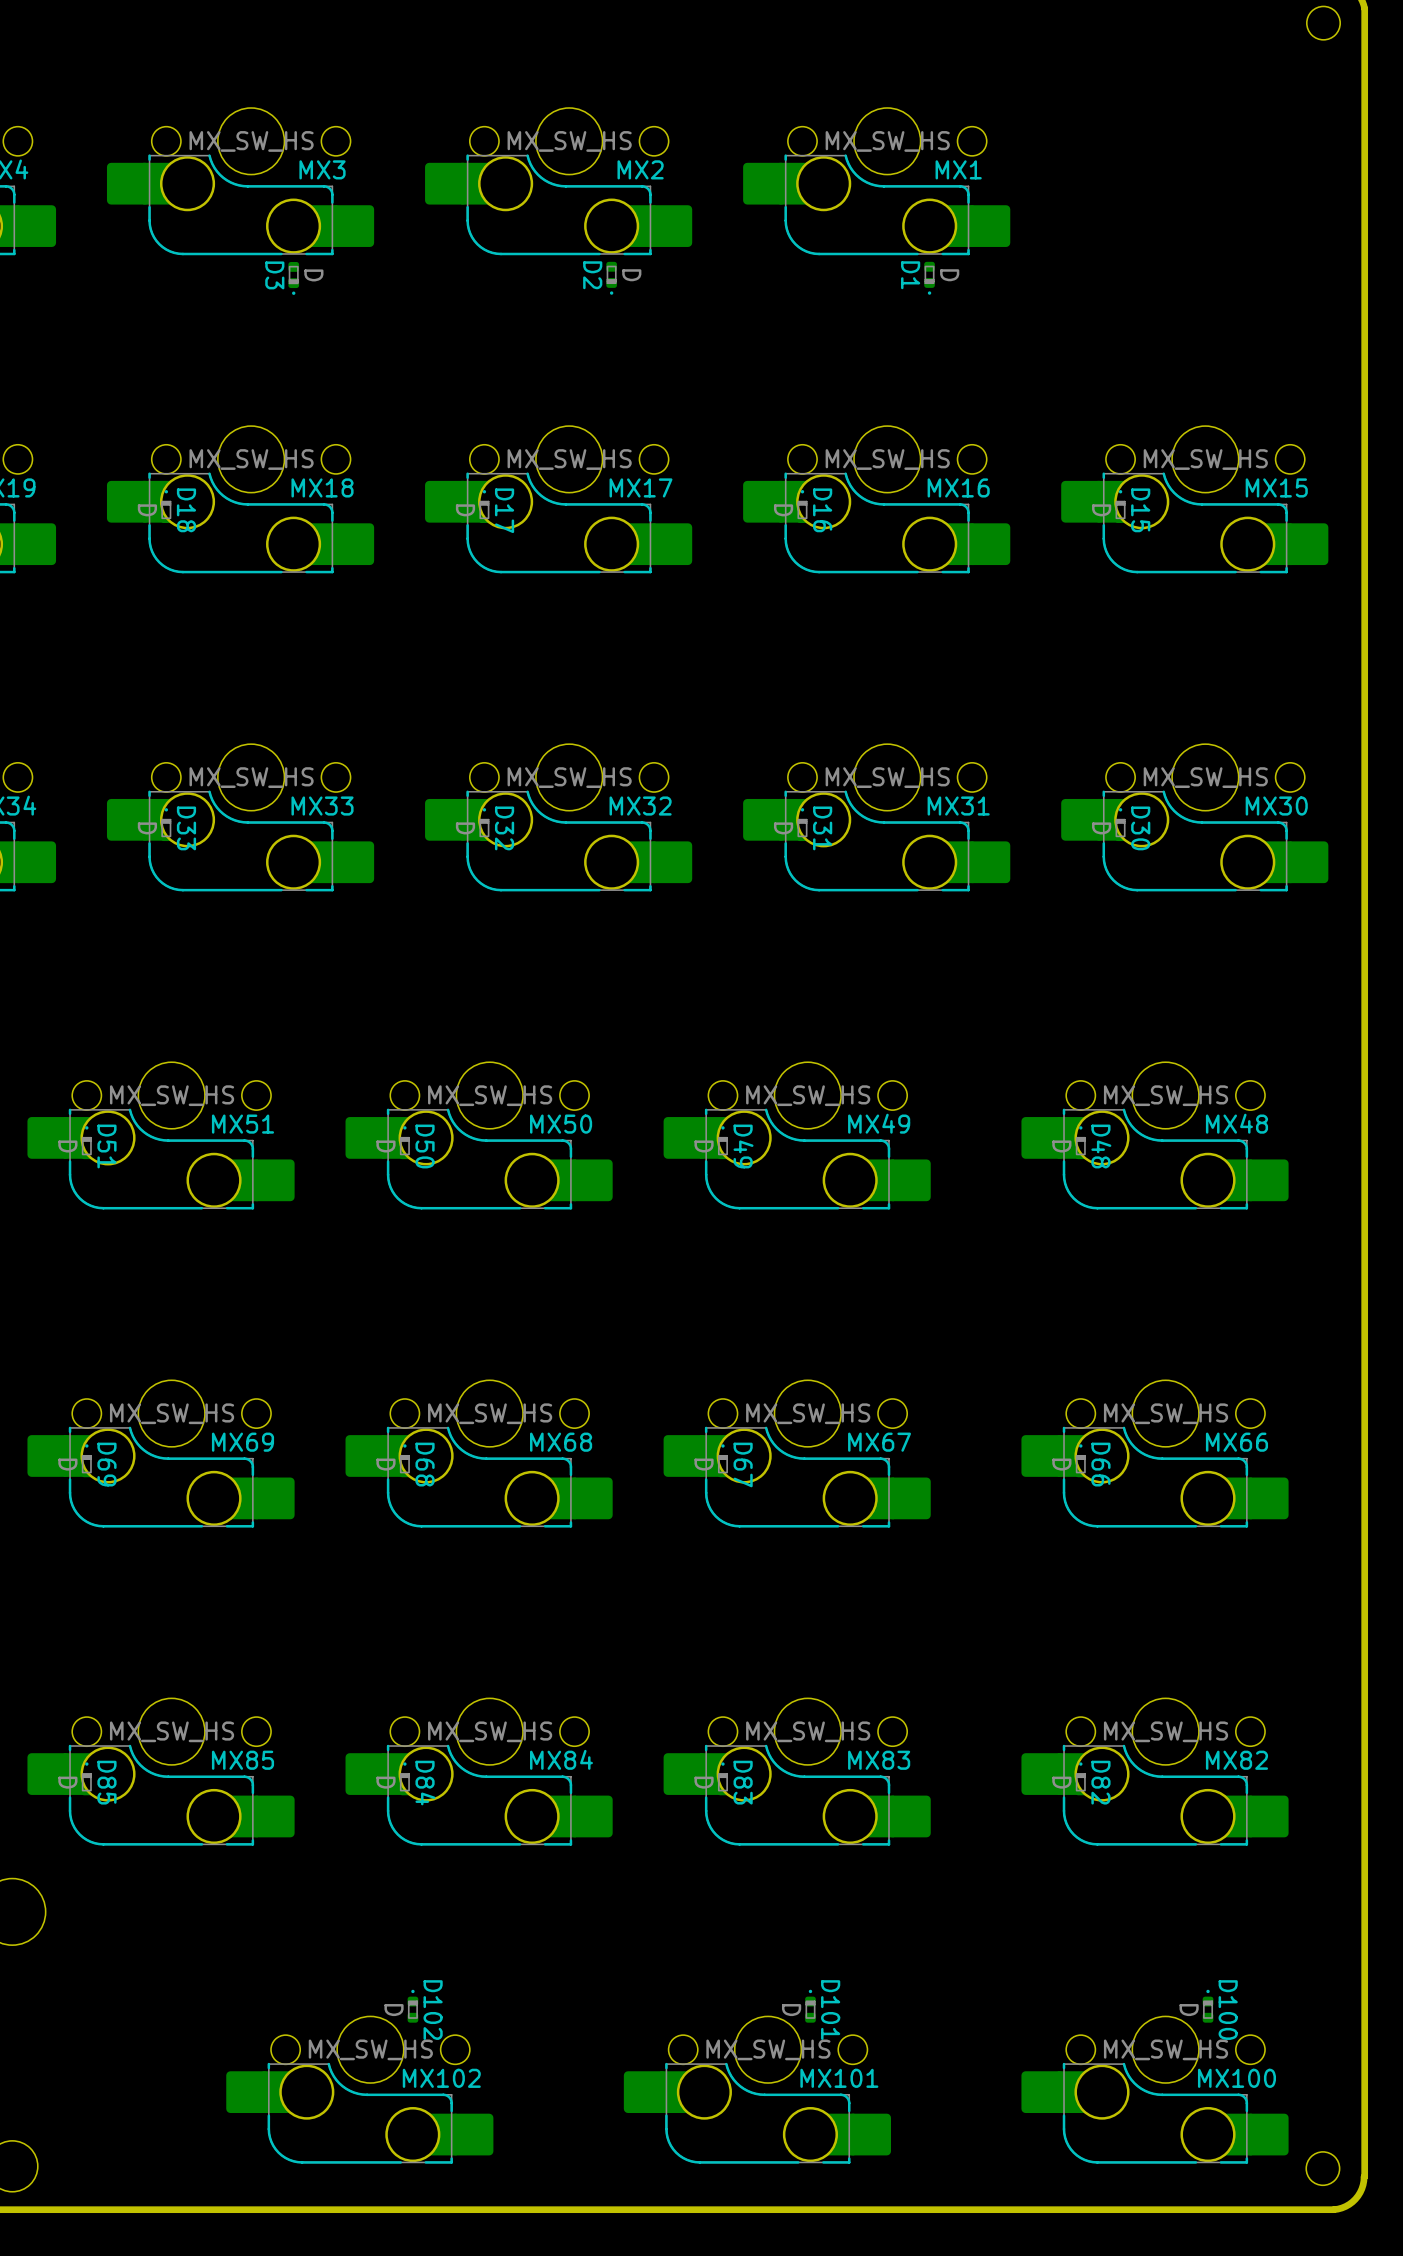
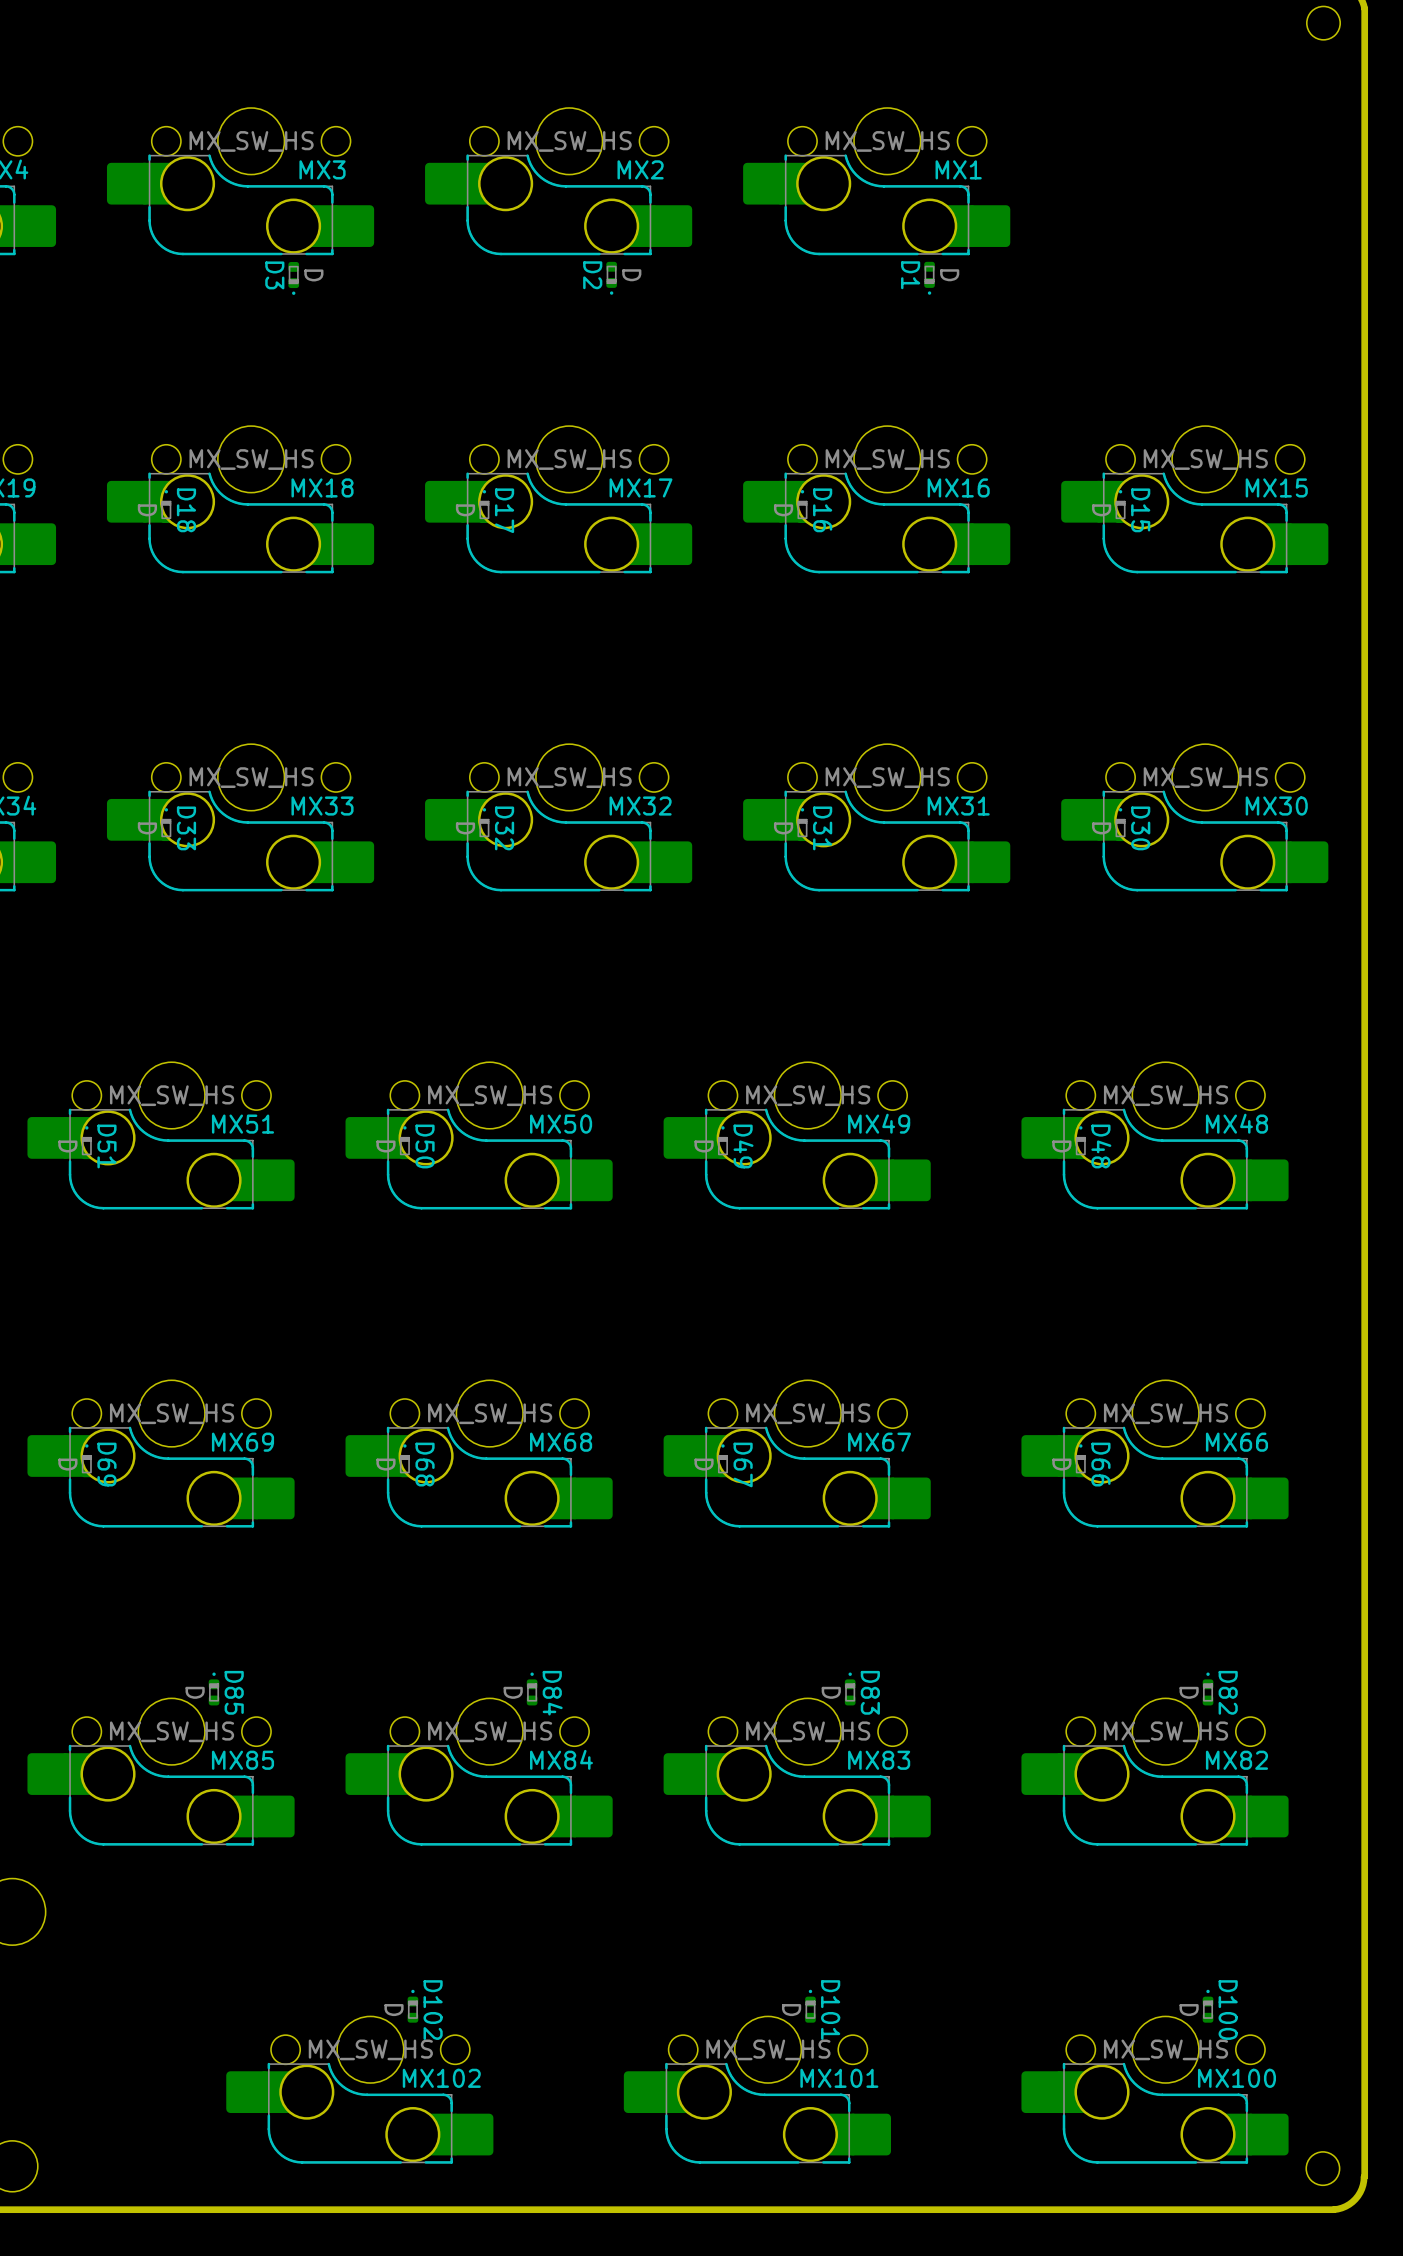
D85 position: (86, 1778) -> (214, 1688)
D84 position: (404, 1778) -> (532, 1688)
D83 position: (722, 1778) -> (850, 1688)
D82 position: (1080, 1778) -> (1208, 1688)

